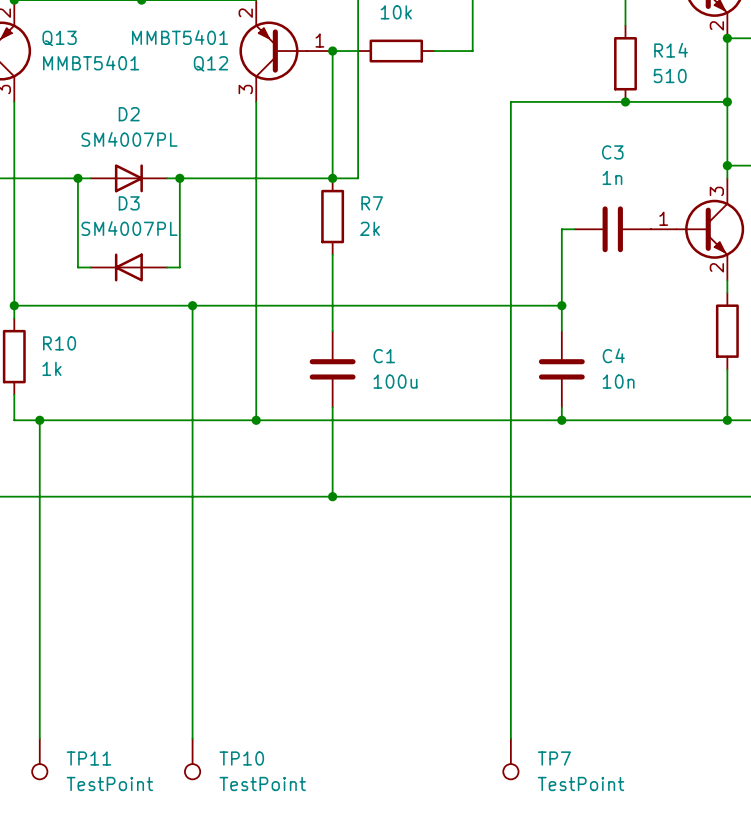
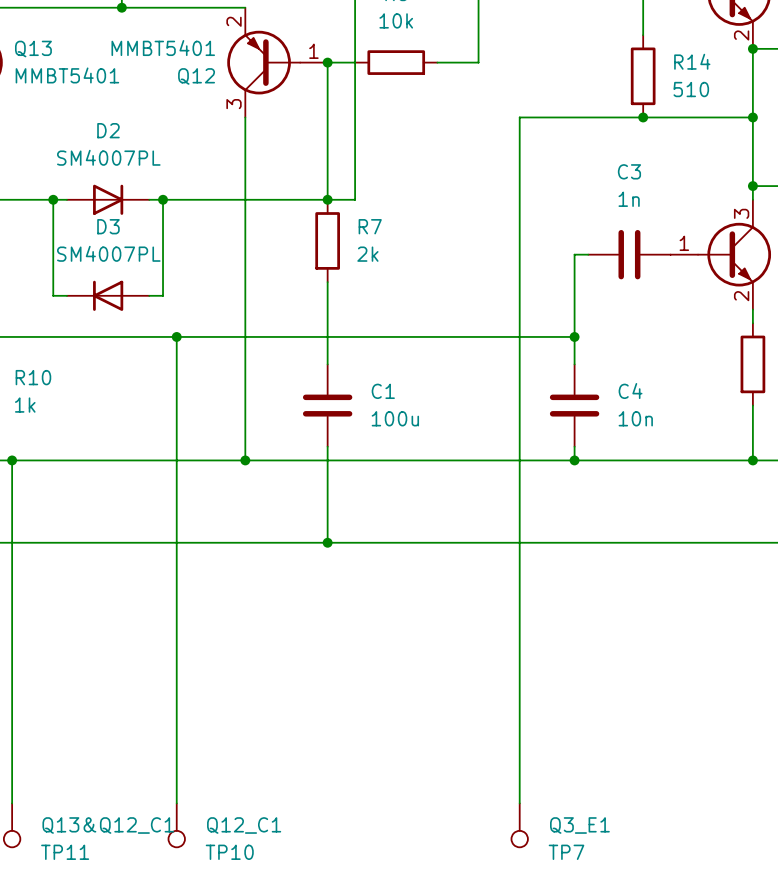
TP11 name: TP11 (88, 758) -> Q13&Q12_C1 (108, 825)
TP10 name: TP10 (241, 758) -> Q12_C1 (244, 825)
TP7 name: TP7 (554, 758) -> Q3_E1 (579, 825)
TP11 value: TestPoint (109, 783) -> TP11 (65, 852)
TP10 value: TestPoint (262, 783) -> TP10 (229, 852)
TP7 value: TestPoint (581, 783) -> TP7 (566, 852)

